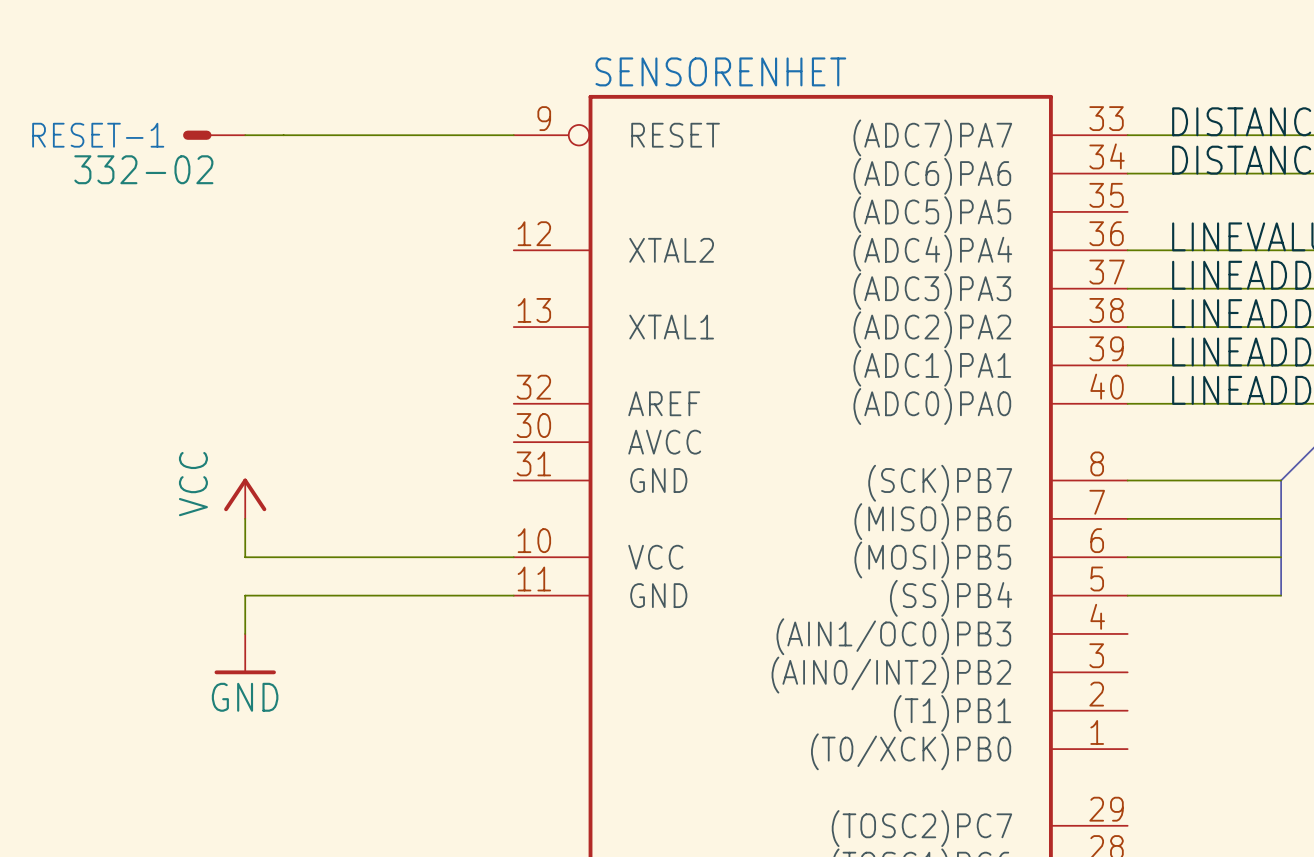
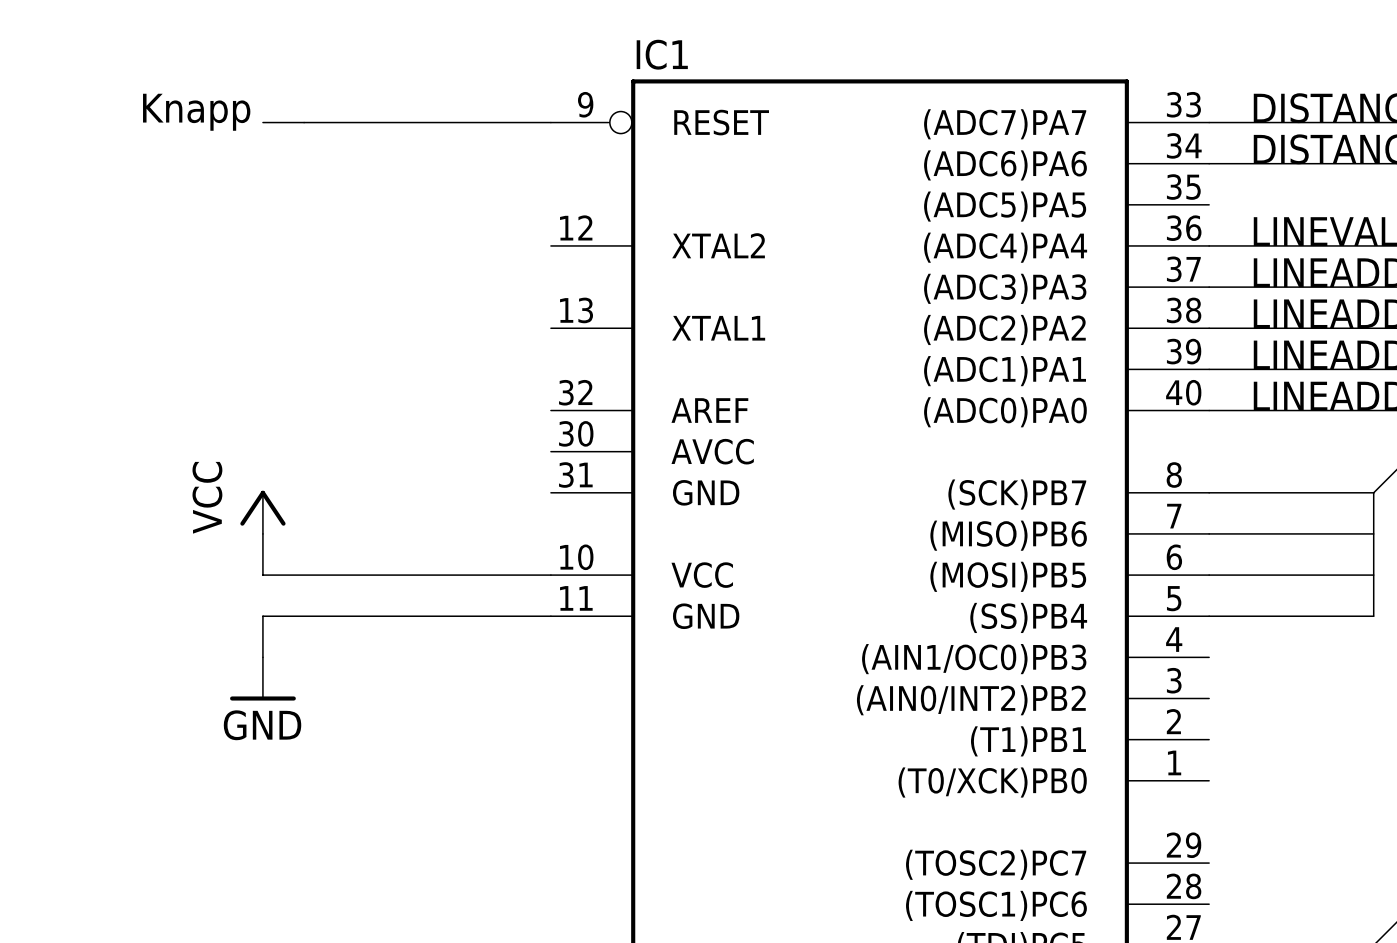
SENSORENHET name: SENSORENHET (720, 71) -> IC1 (662, 54)
text: none -> Knapp (196, 112)
RESET-1: 332-02 (214, 135) -> none

